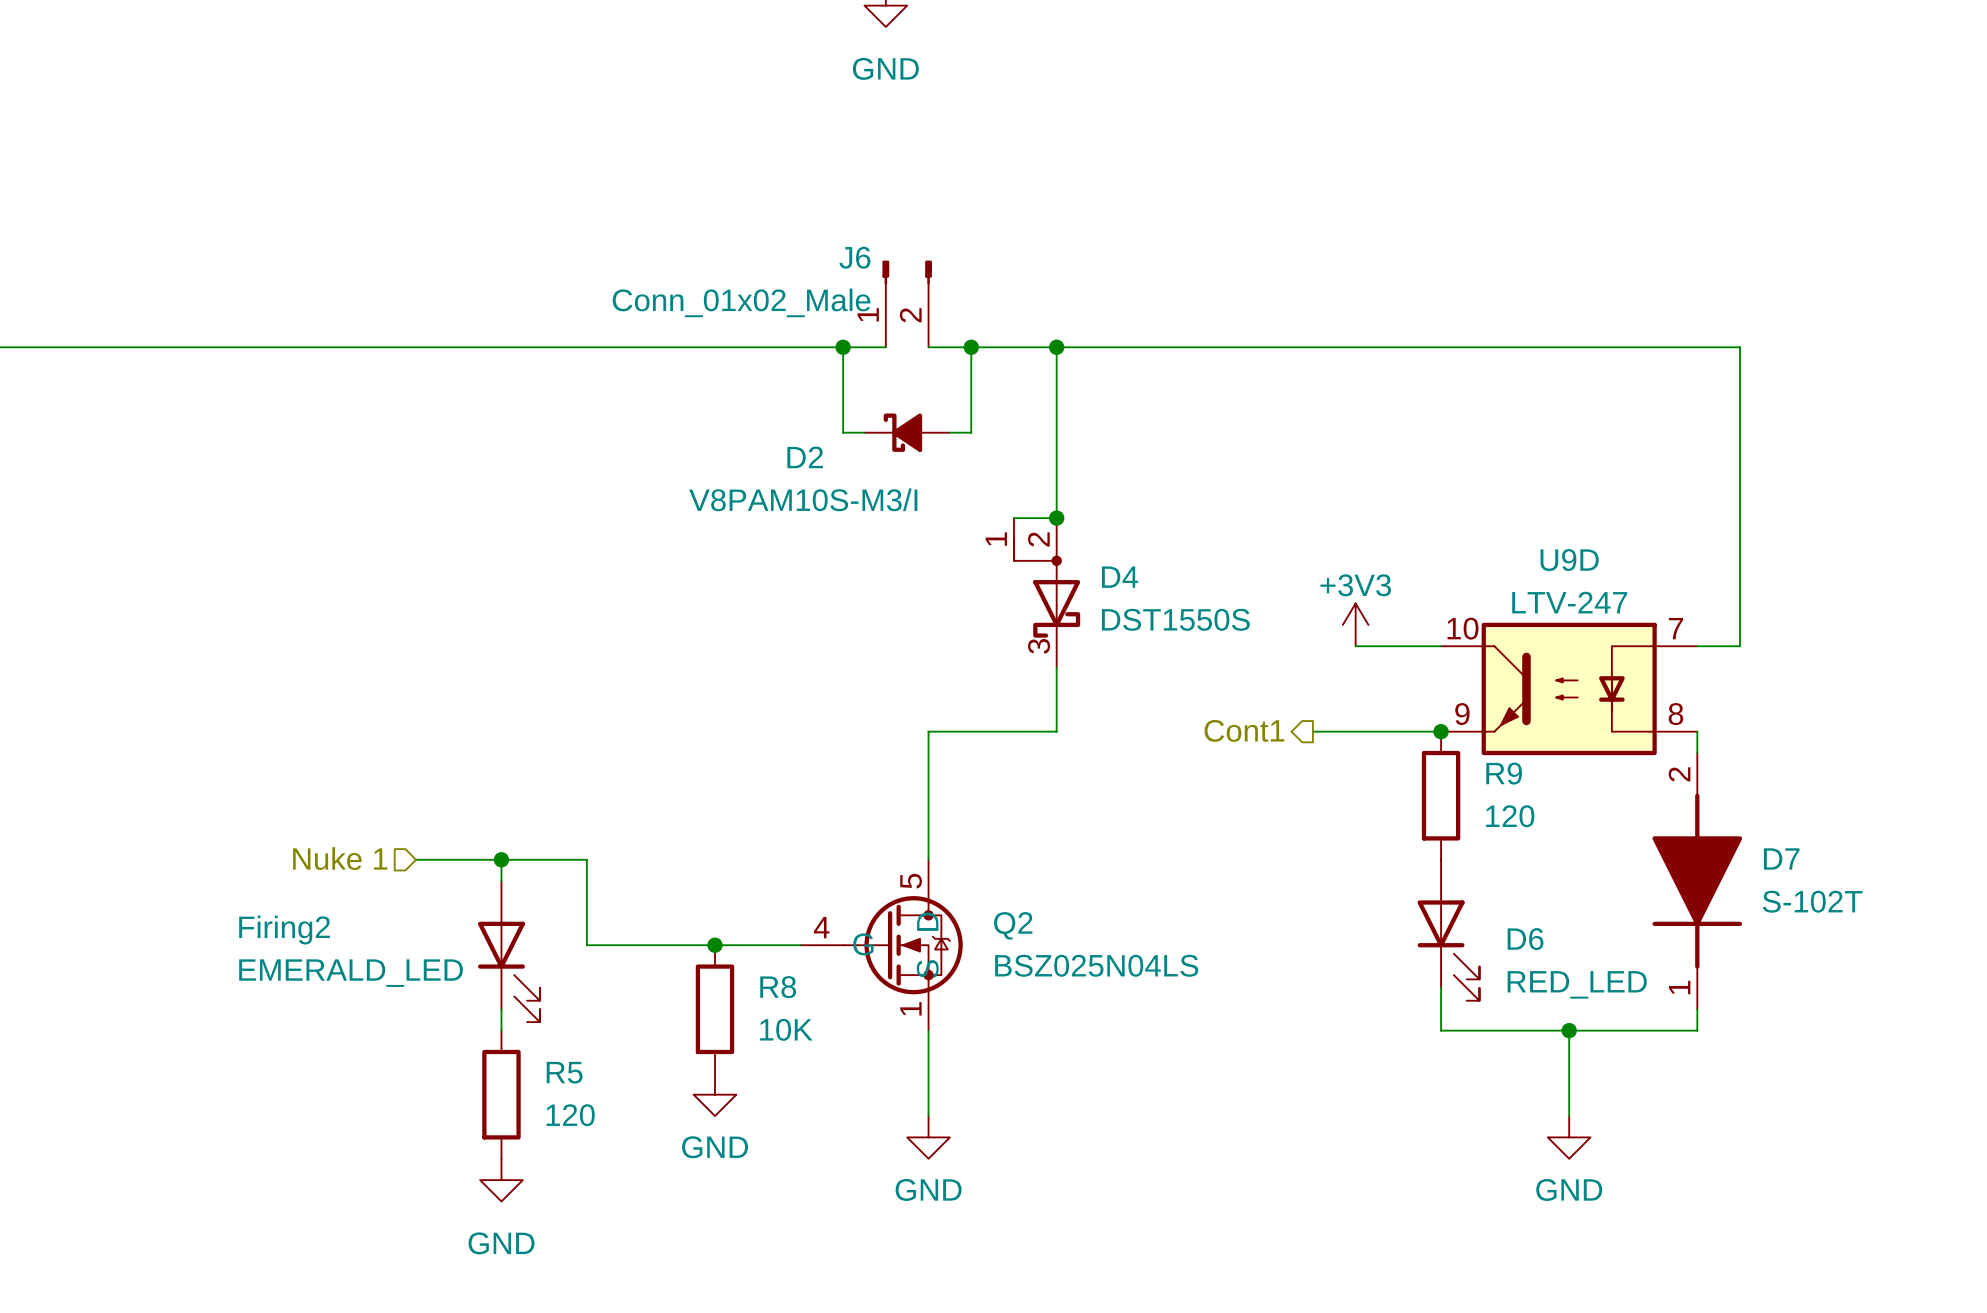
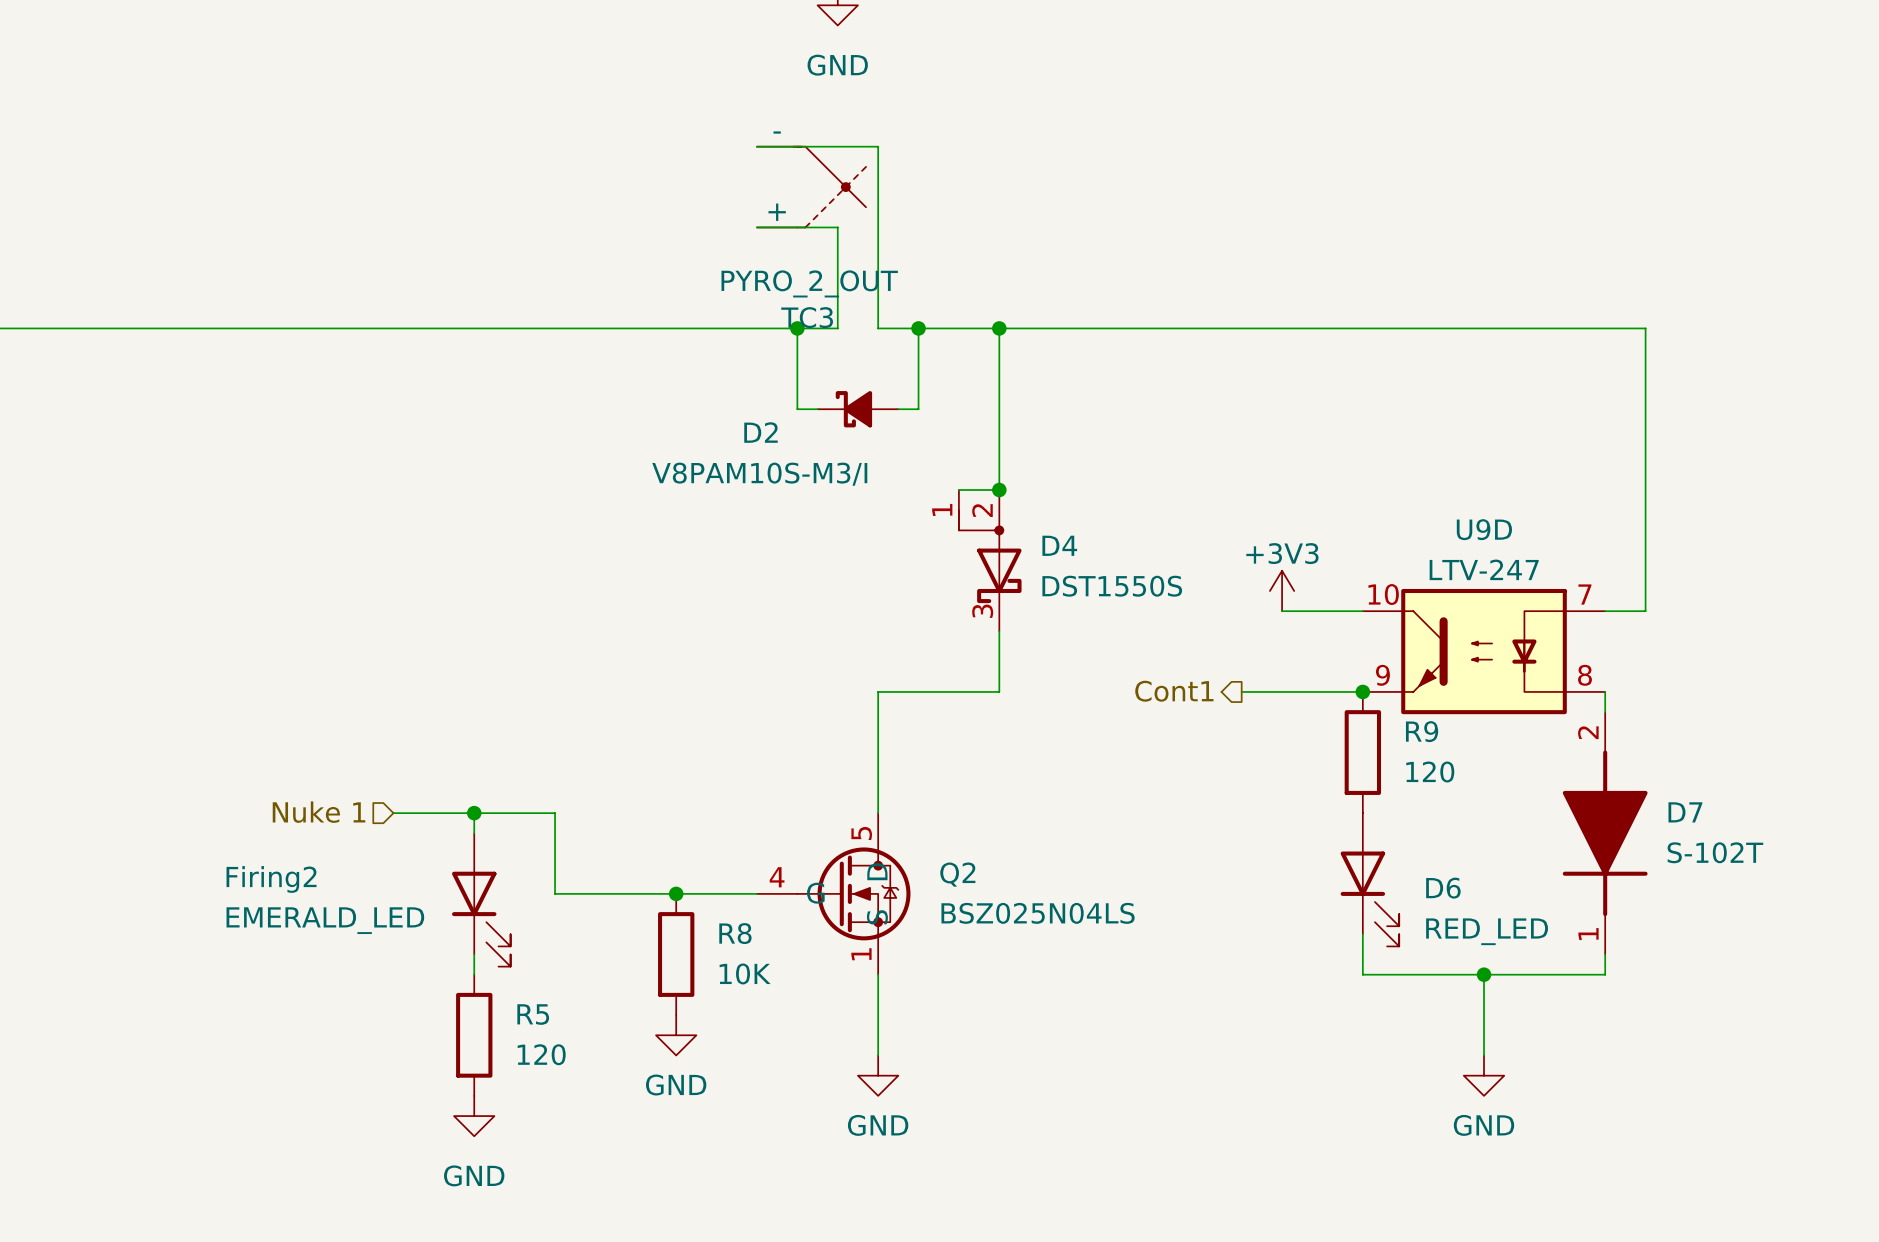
wire: none -> (756, 146) (878, 146) (878, 328)
TC3: none -> PYRO_2_OUT (811, 187)
wire: none -> (756, 227) (837, 227) (837, 328)
J6: Conn_01x02_Male (907, 303) -> none

